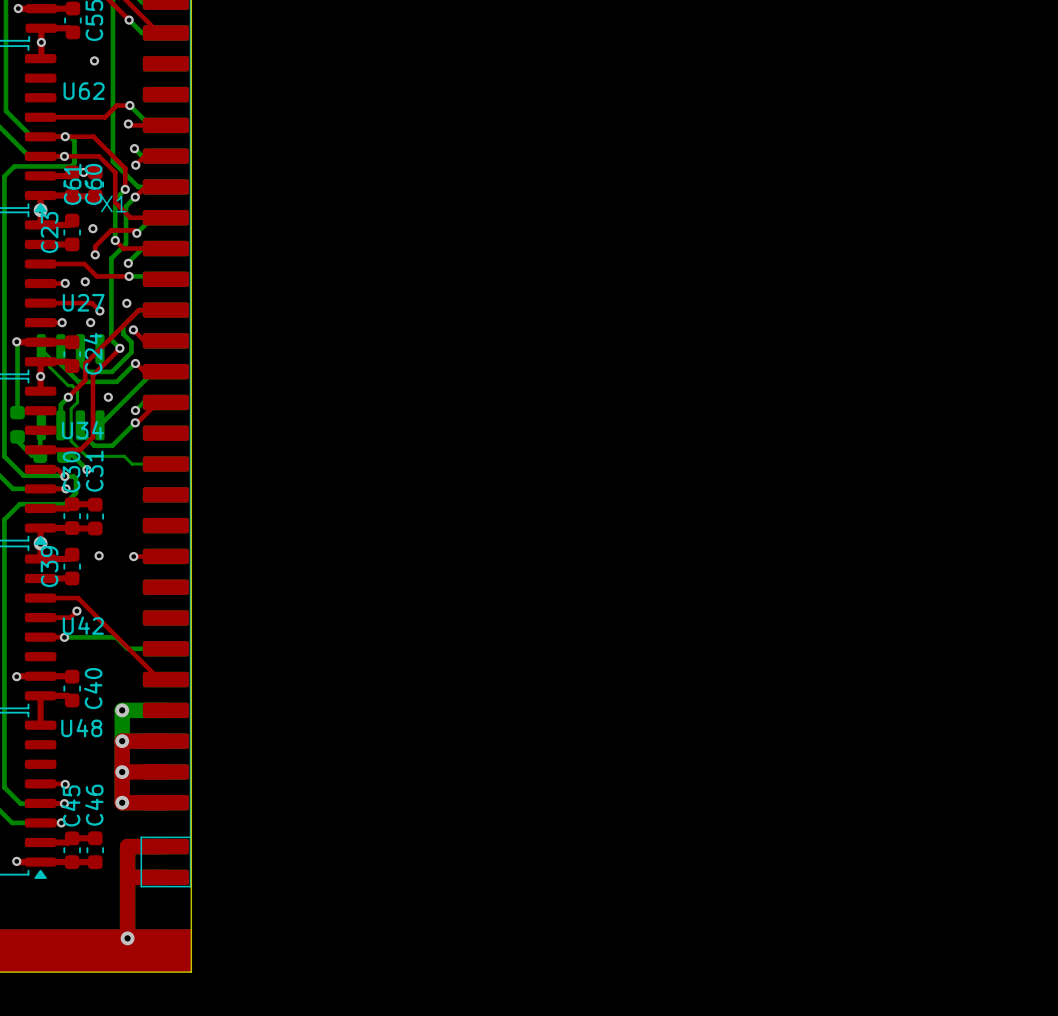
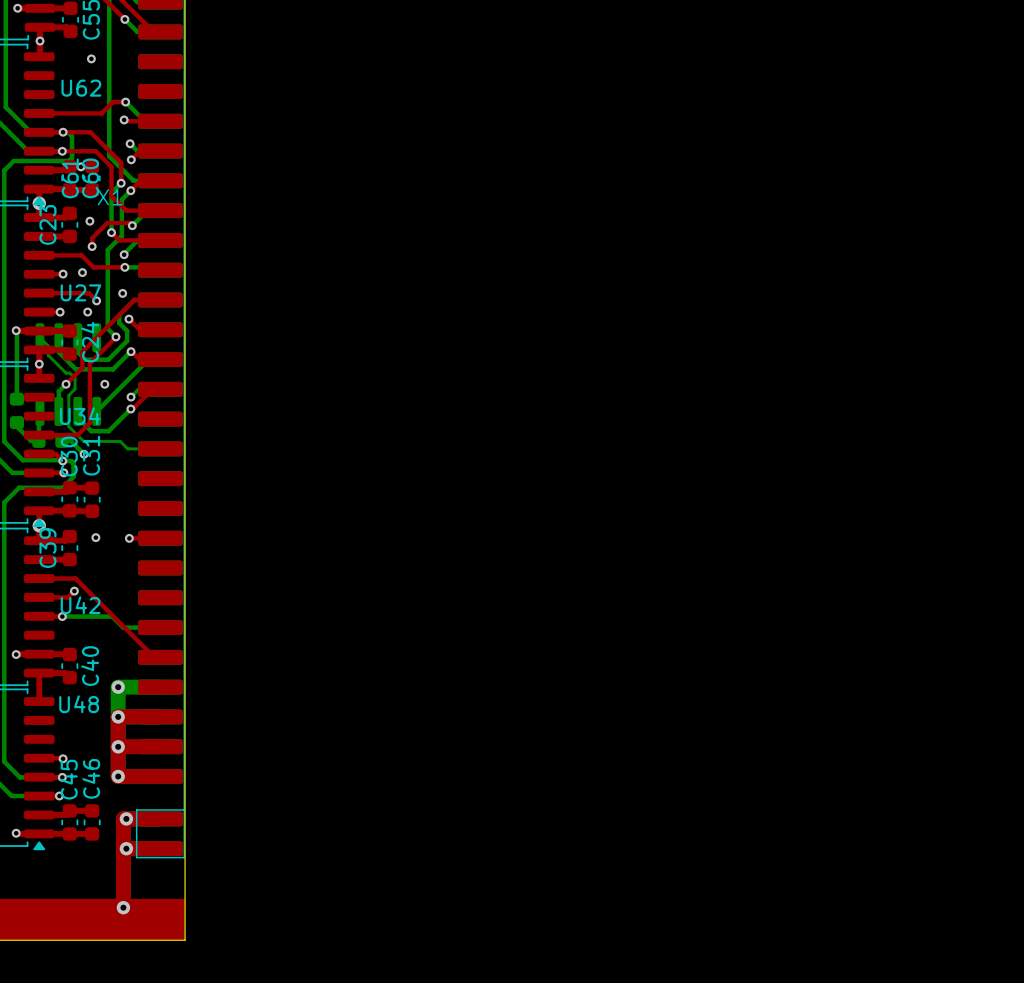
via: none -> (126, 818)
via: none -> (126, 848)

